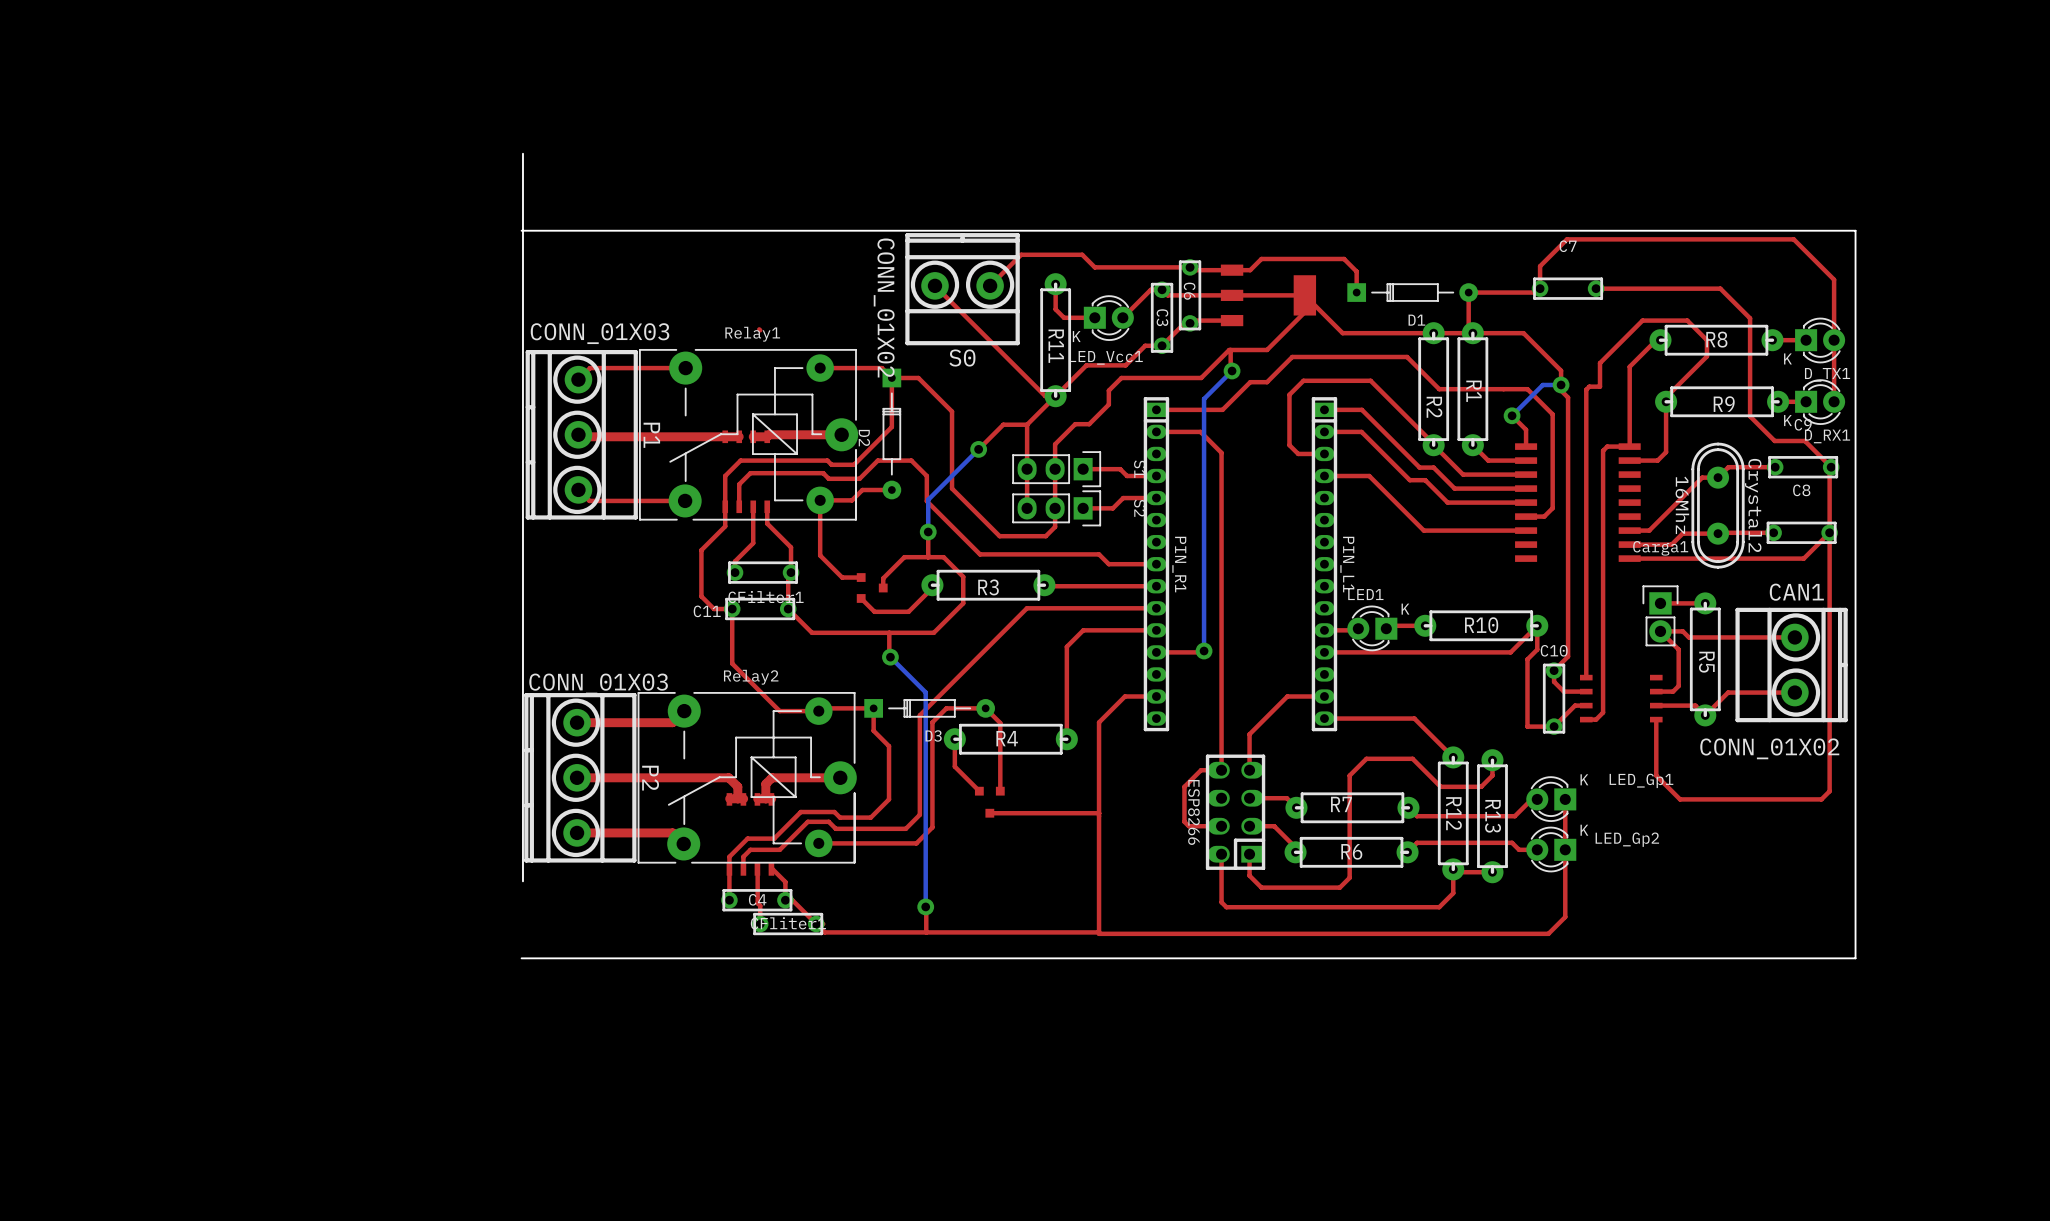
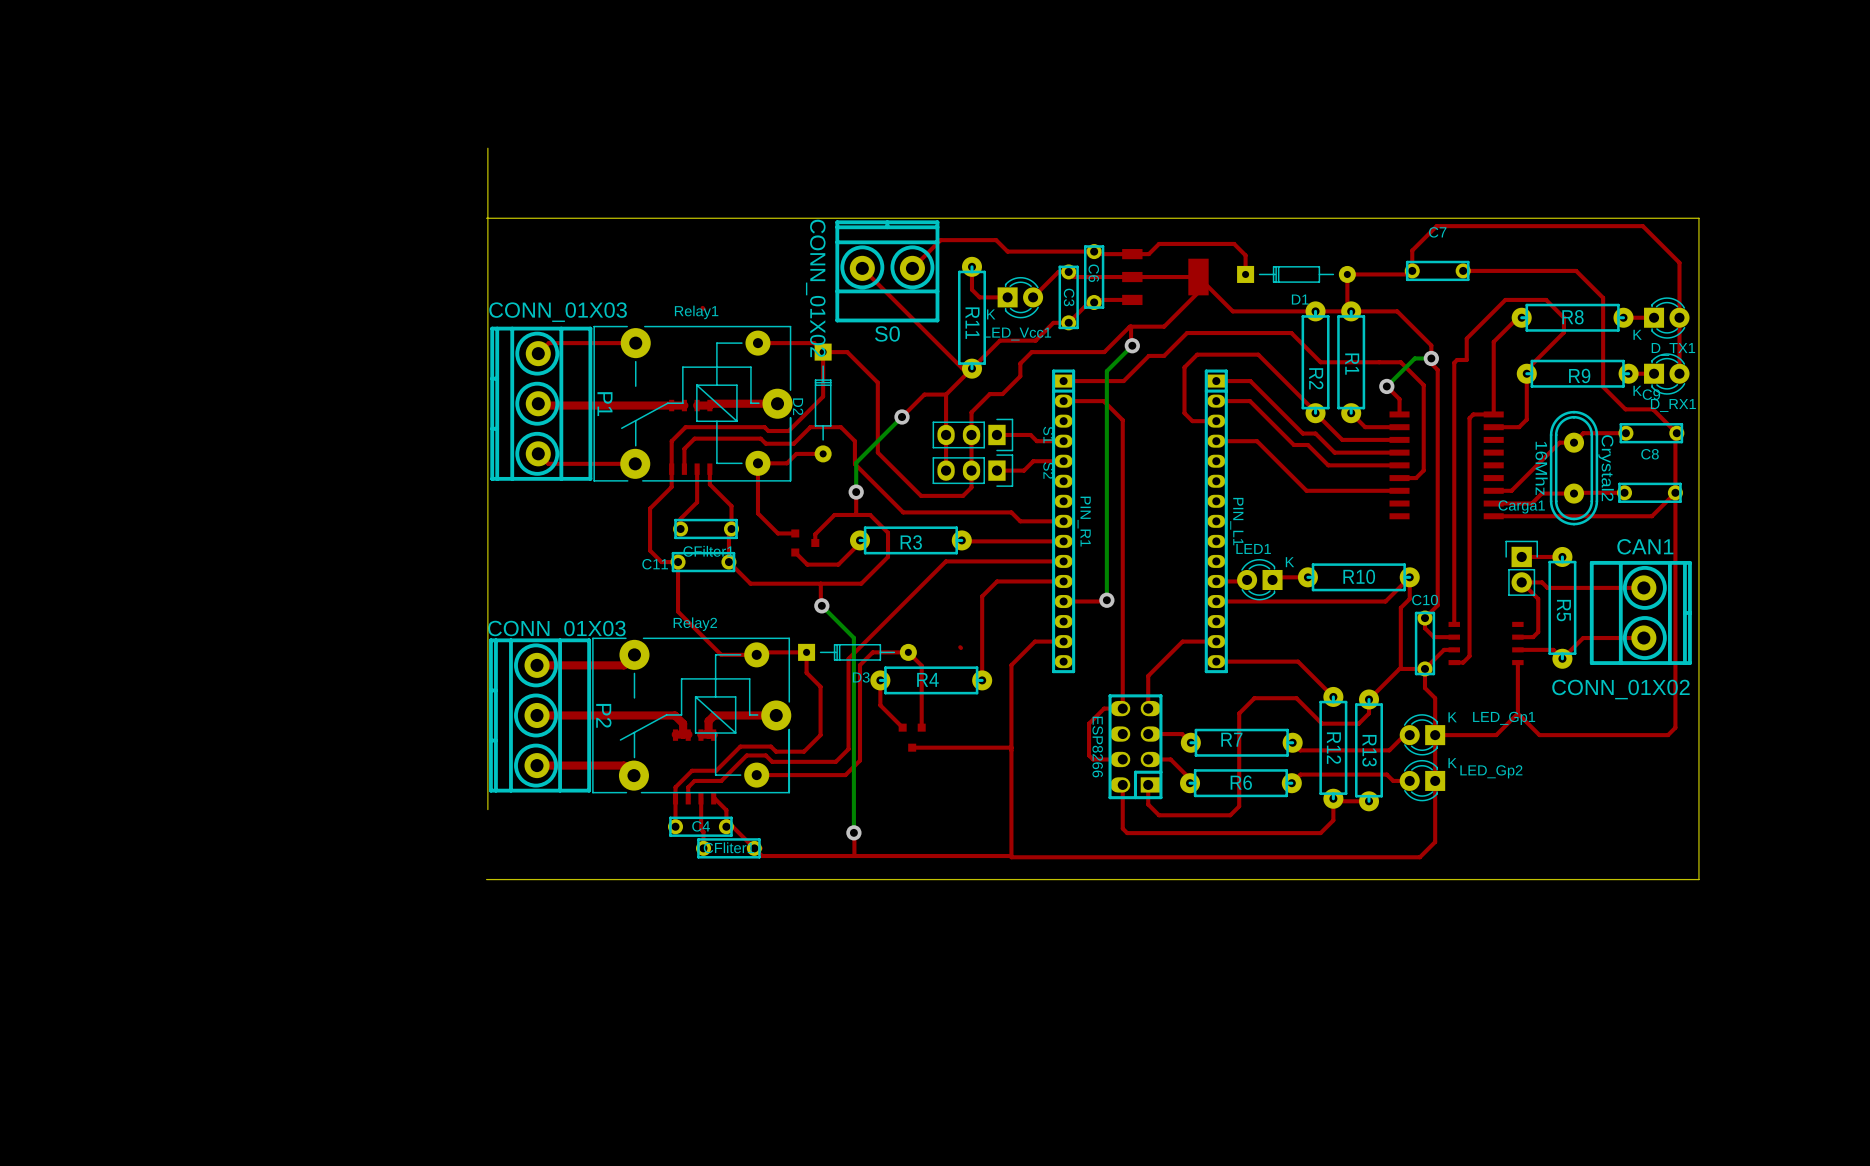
top track: none -> (960, 647) (961, 647)
top track: none -> (1400, 668) (1369, 699)
top track: none -> (1424, 668) (1424, 688) (1435, 698) (1435, 735) (1496, 735) (1517, 713)

